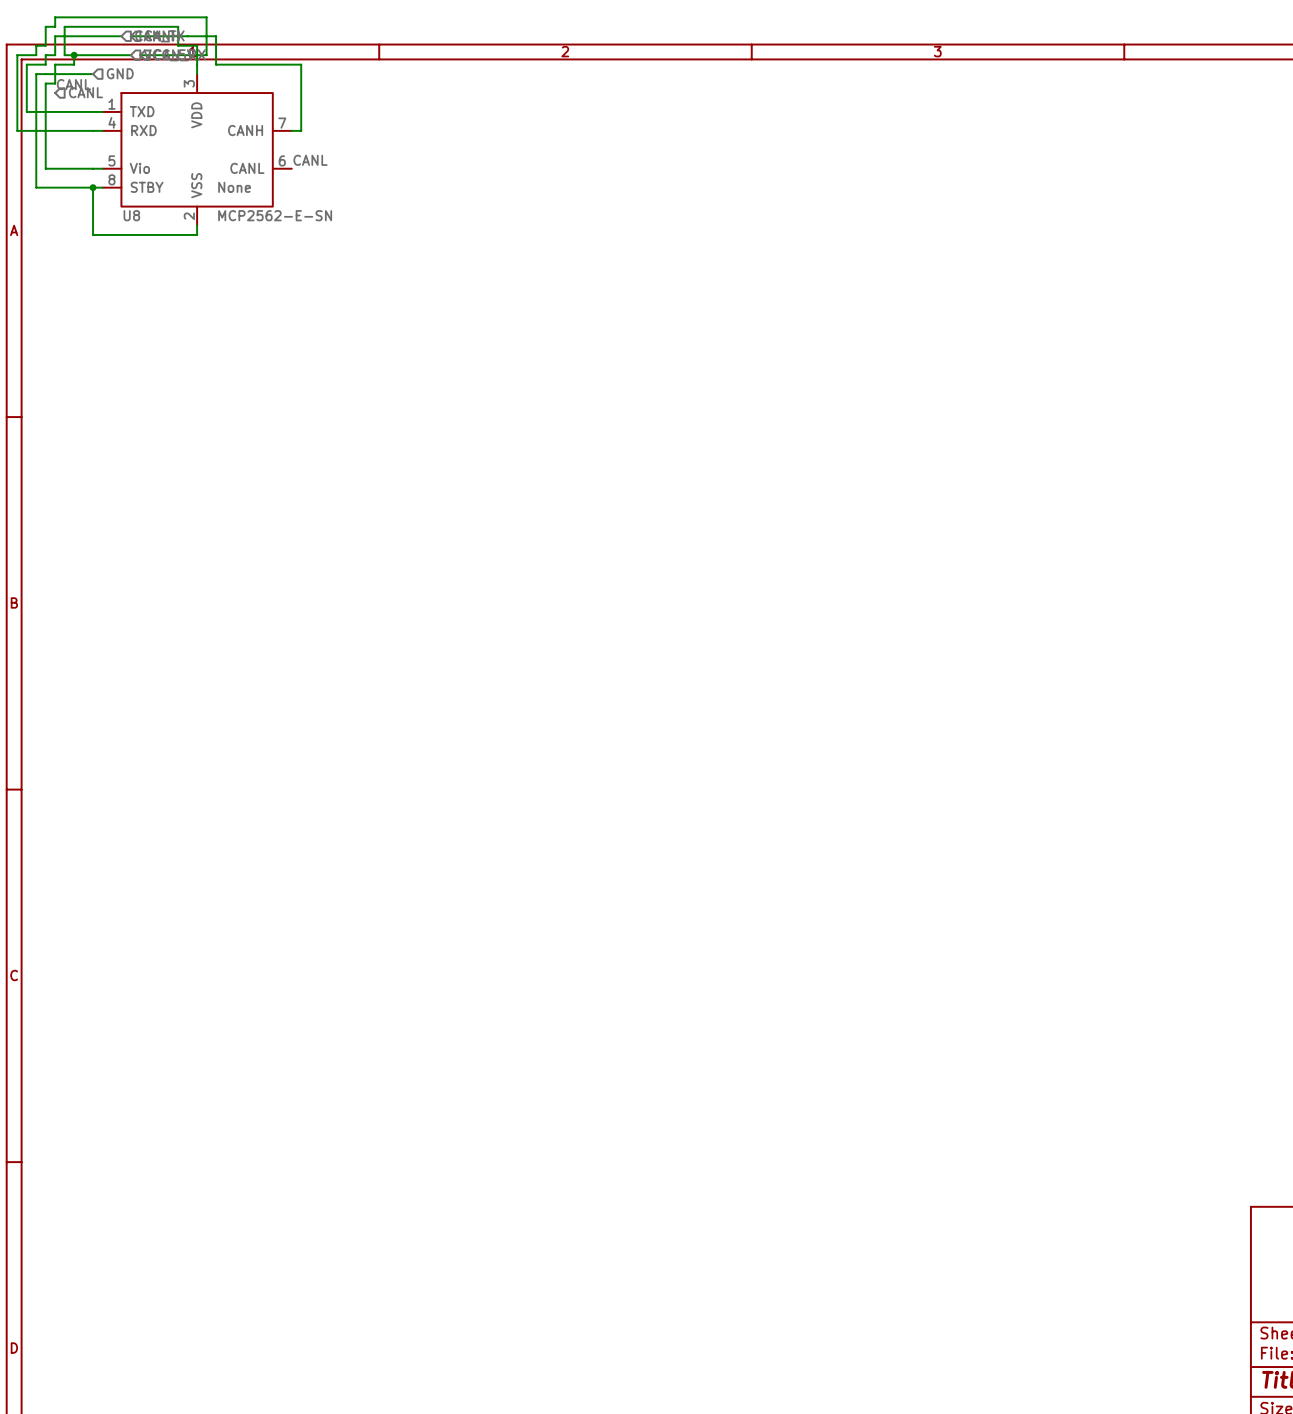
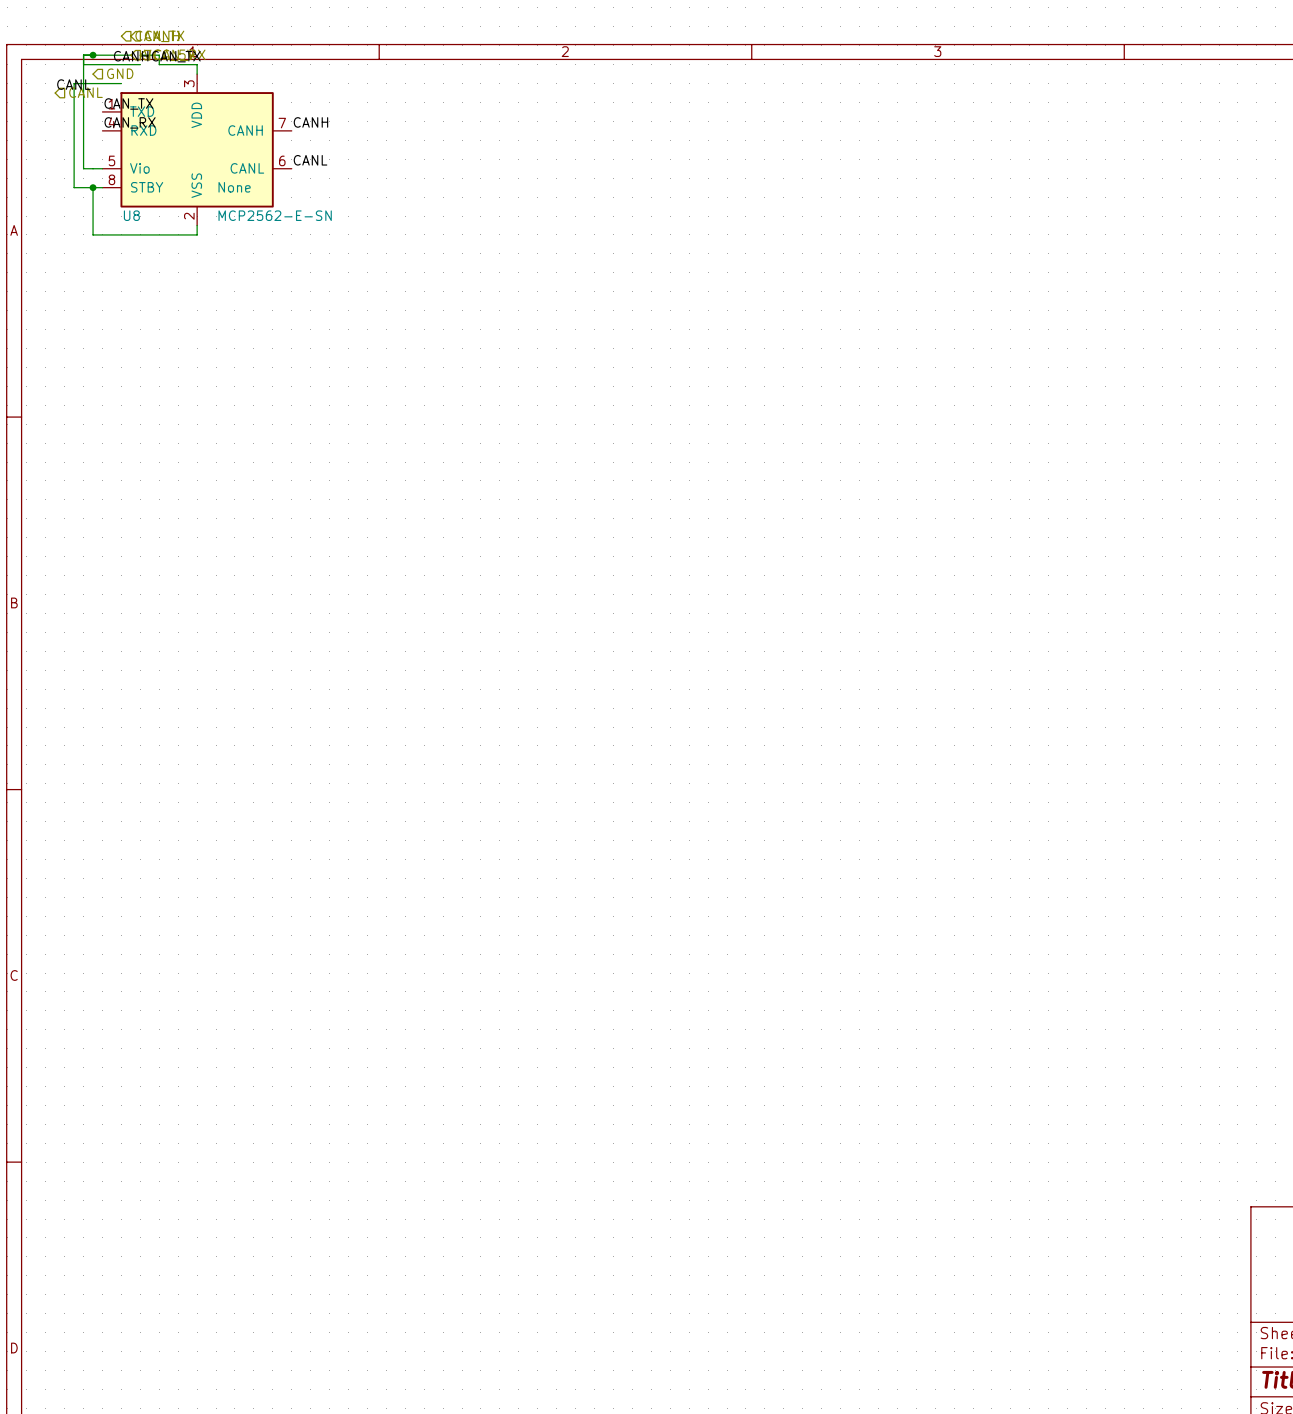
wire: (121, 36) (55, 36) (55, 55) (45, 55) (45, 64) (26, 64) (26, 111) (102, 111) -> none
wire: (130, 36) (216, 36) (216, 64) (301, 64) (301, 130) (291, 130) -> none
wire: (74, 55) (74, 64) (55, 64) (55, 83) (45, 83) (45, 168) (83, 168) -> (83, 55) (83, 168)
junction position: (74, 55) -> (93, 55)
wire: (83, 55) (64, 55) (64, 26) (178, 26) (178, 45) (197, 45) (197, 64) -> (159, 55) (159, 64) (197, 64)
wire: (159, 55) (206, 55) (206, 17) (55, 17) (55, 26) (45, 26) (45, 45) (36, 45) (36, 55) (17, 55) (17, 130) (102, 130) -> none
label: none -> CANH (131, 56)
label: none -> CAN_TX (176, 56)
wire: none -> (83, 64) (140, 64)
wire: (93, 74) (36, 74) (36, 187) (74, 187) -> (121, 83) (74, 83) (74, 187)
label: none -> CAN_TX (128, 103)
label: none -> CAN_RX (130, 122)
label: none -> CANH (310, 122)

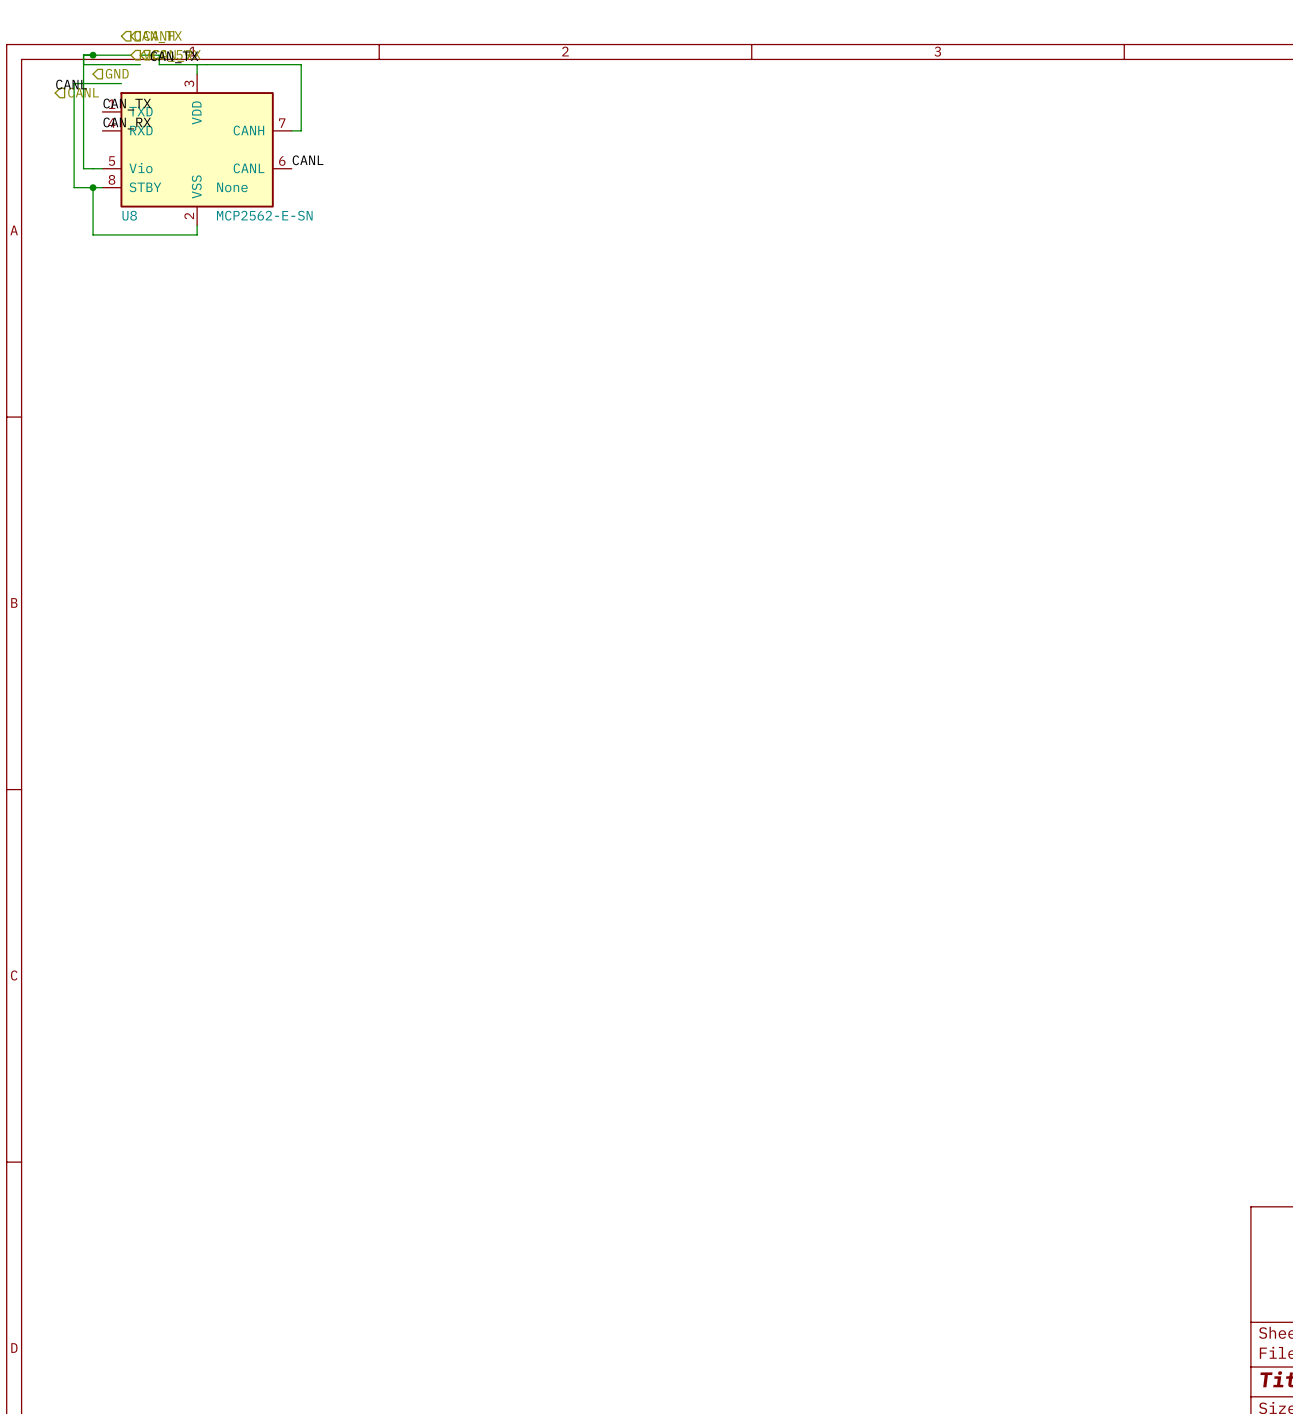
label: CANH (131, 56) -> none
wire: none -> (197, 64) (301, 64) (301, 130) (291, 130)
label: CANH (310, 122) -> none

